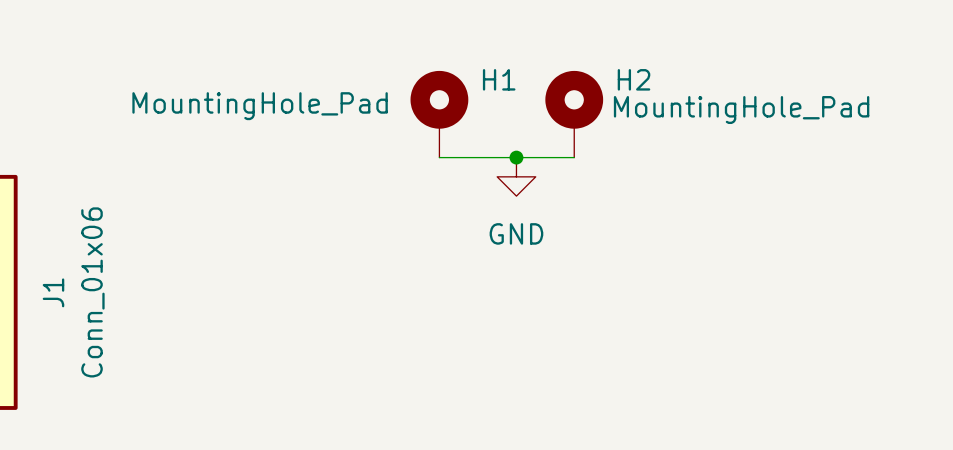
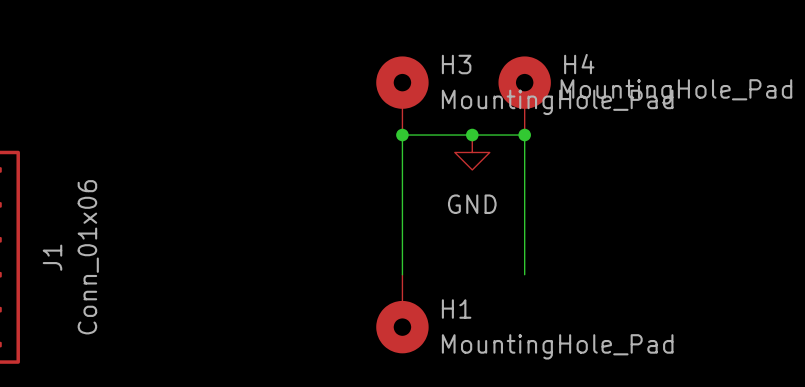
H1 name: H1 (499, 79) -> H3 (456, 64)
H2 name: H2 (634, 79) -> H4 (579, 64)
H1 value position: MountingHole_Pad (260, 106) -> MountingHole_Pad (557, 102)
wire: none -> (402, 135) (402, 274)
junction: none -> (402, 135)
wire: none -> (524, 135) (524, 274)
junction: none -> (524, 135)
H1: none -> MountingHole_Pad (402, 314)

